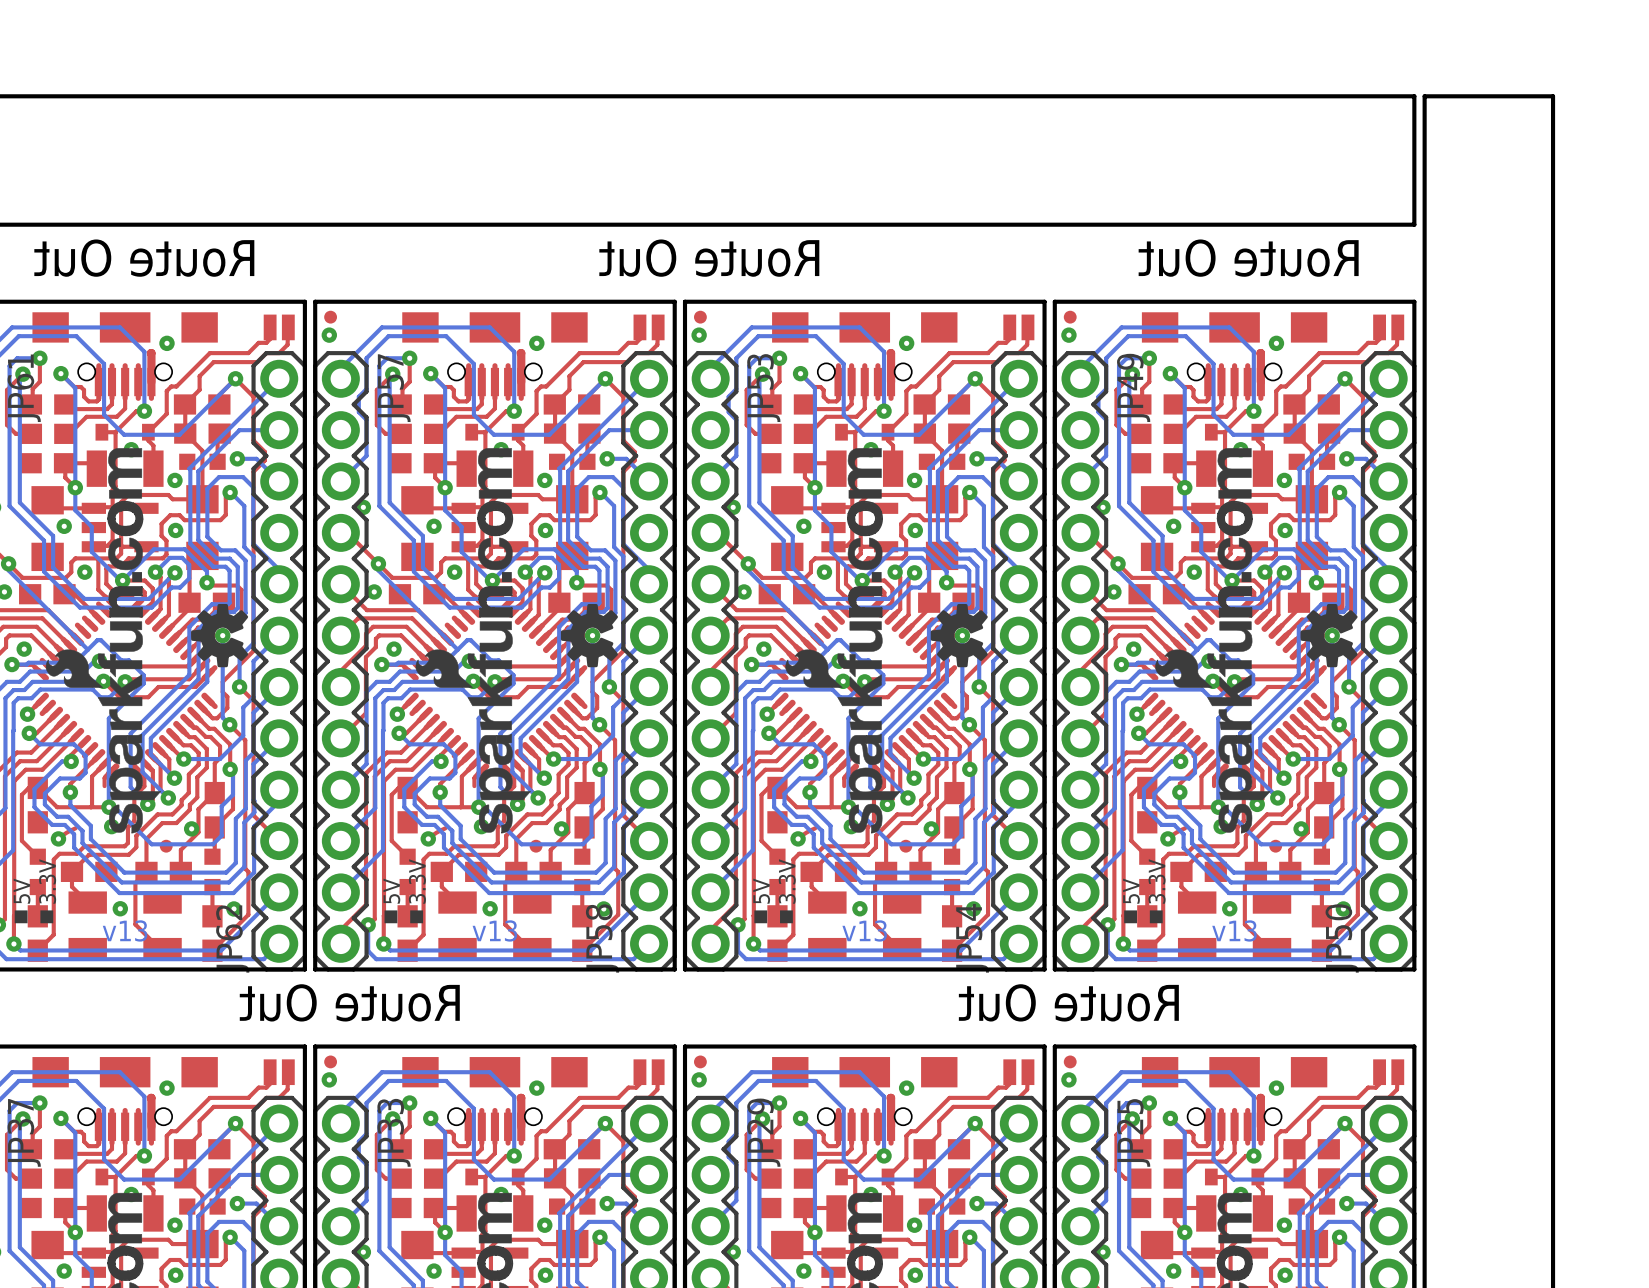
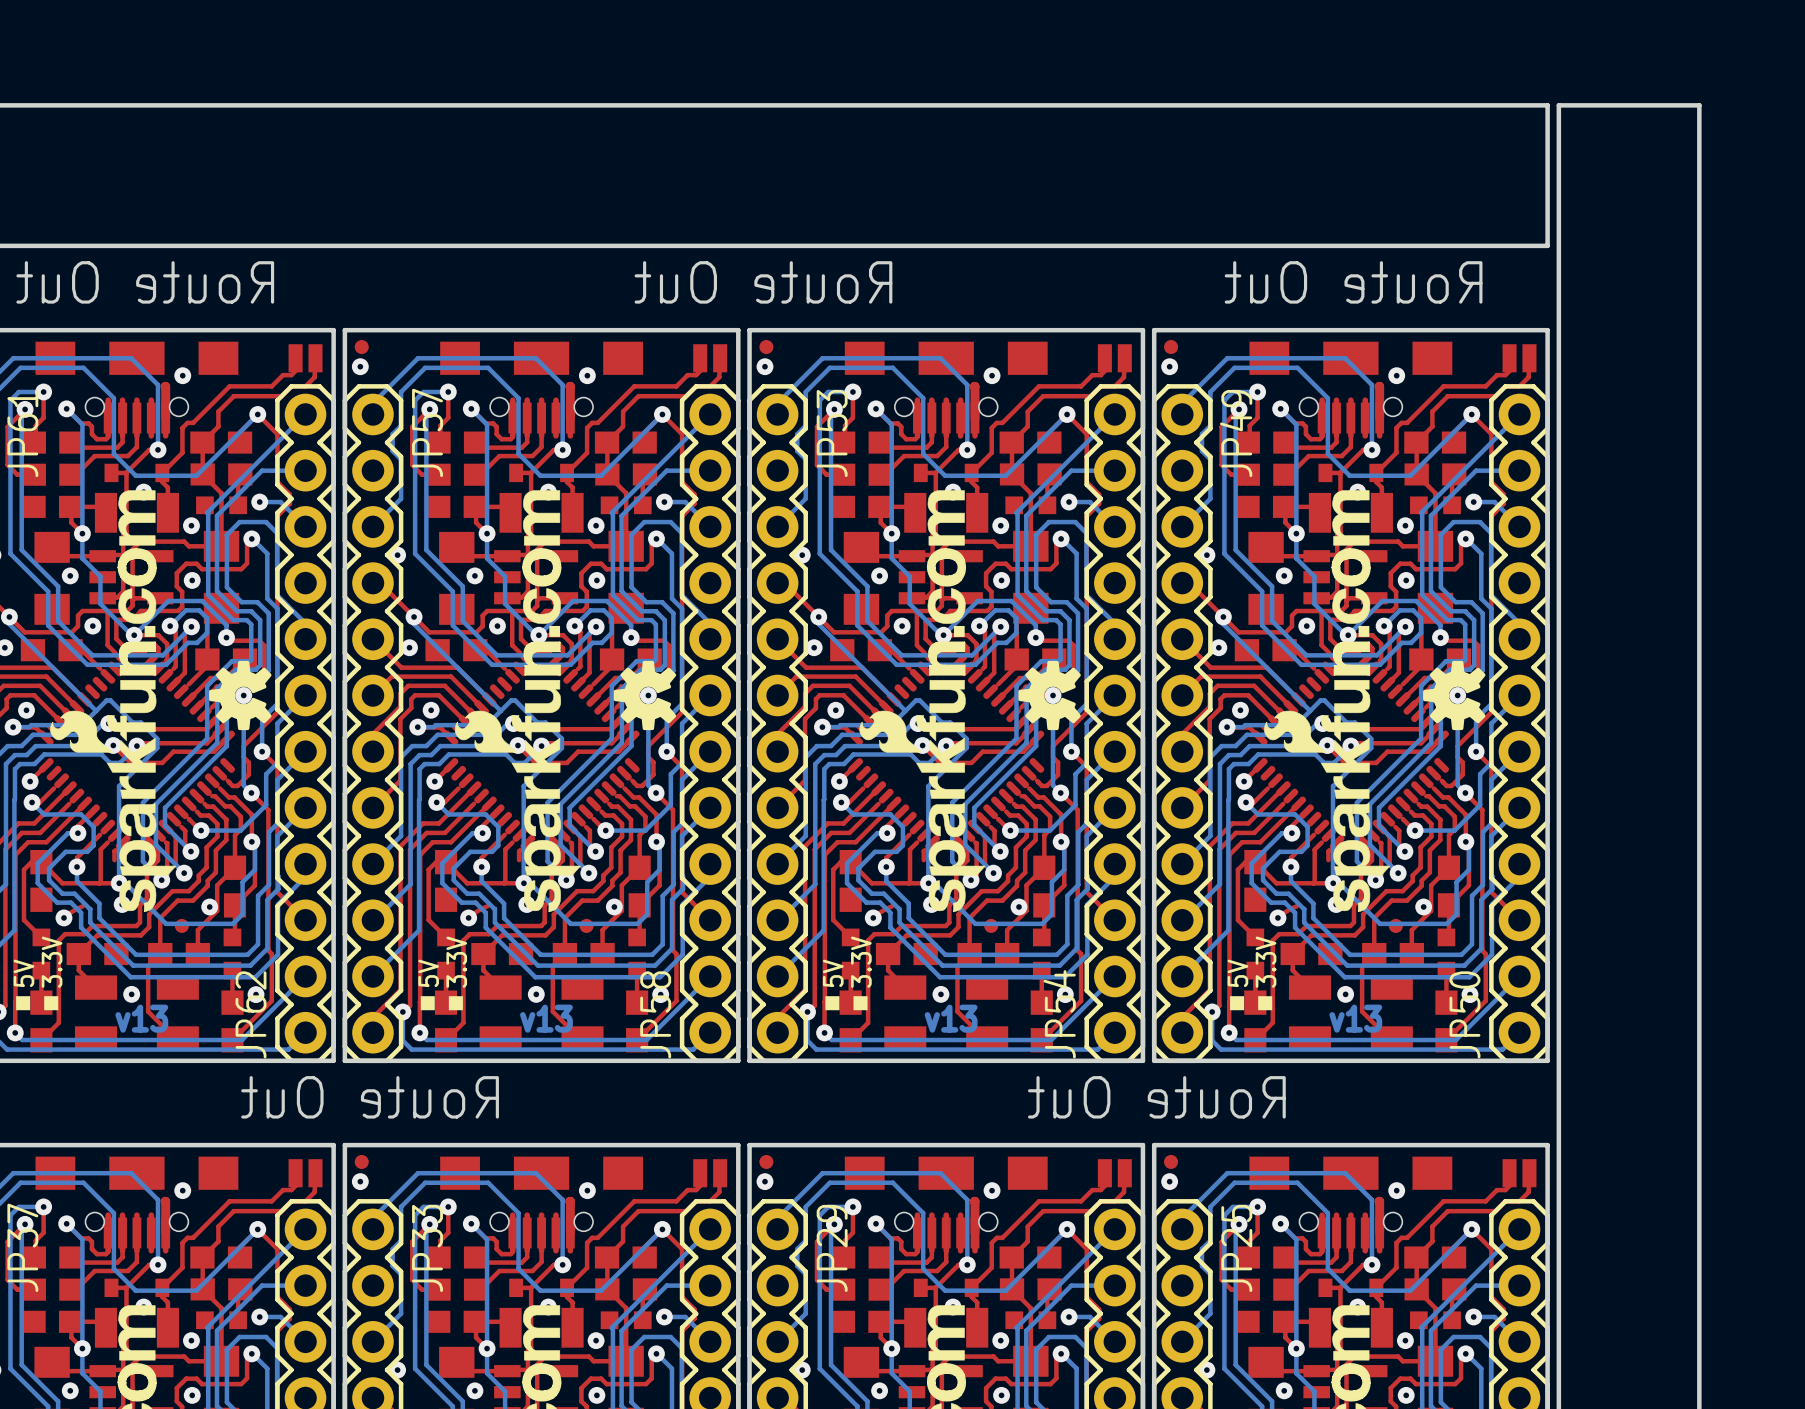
part footprint: [32, 594, 218, 780] -> [38, 653, 236, 850]
part footprint: [402, 594, 588, 780] -> [443, 653, 640, 850]
part footprint: [772, 594, 958, 780] -> [848, 653, 1045, 850]
part footprint: [1142, 594, 1328, 780] -> [1252, 653, 1449, 850]

